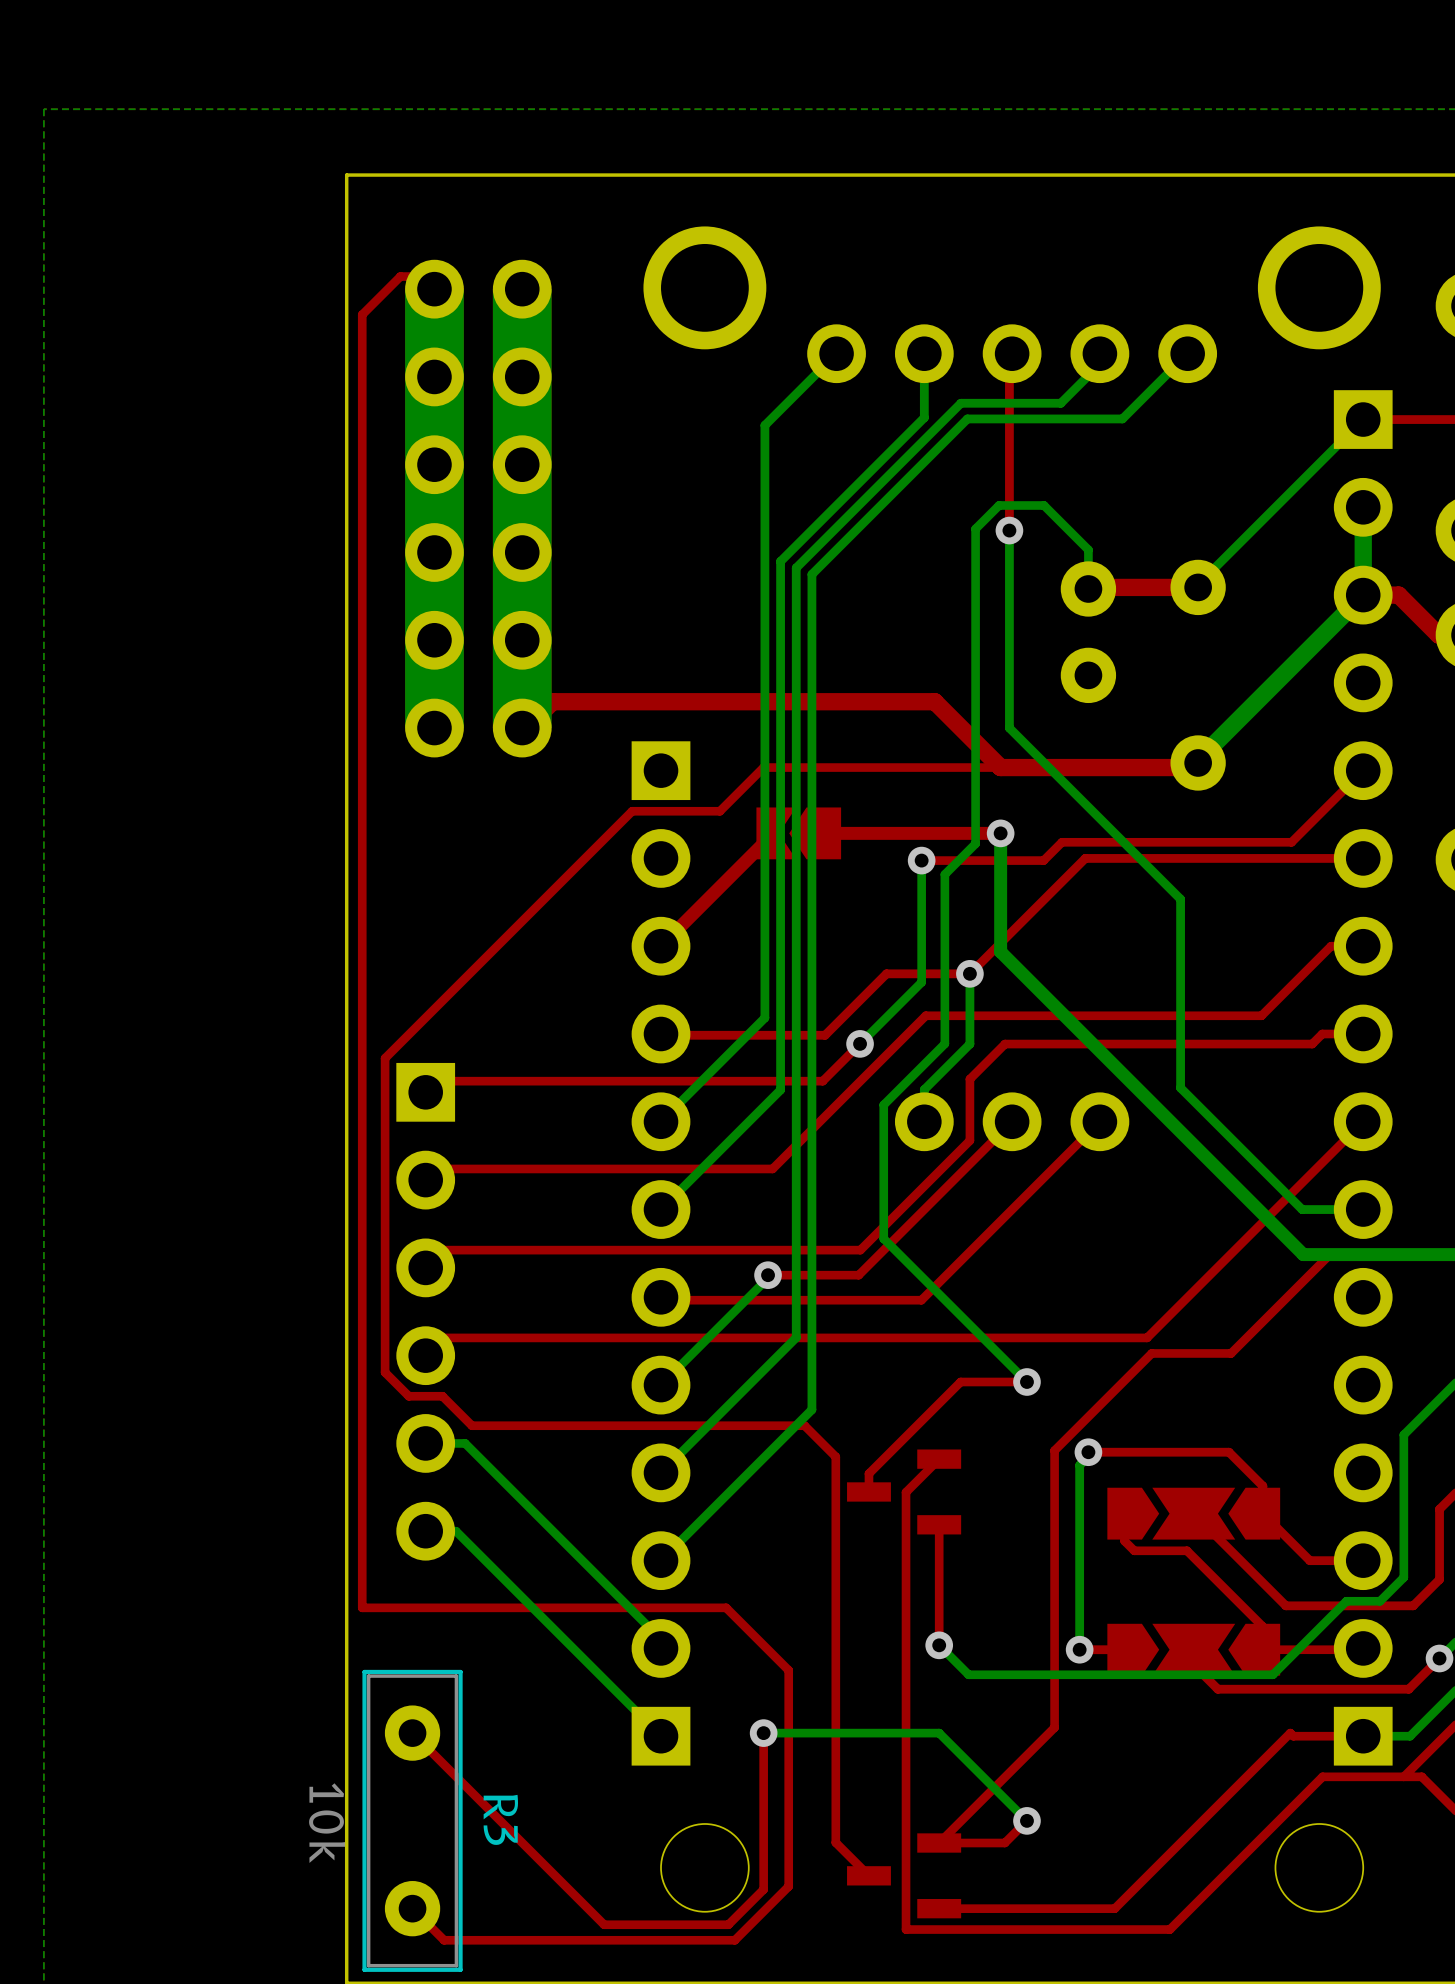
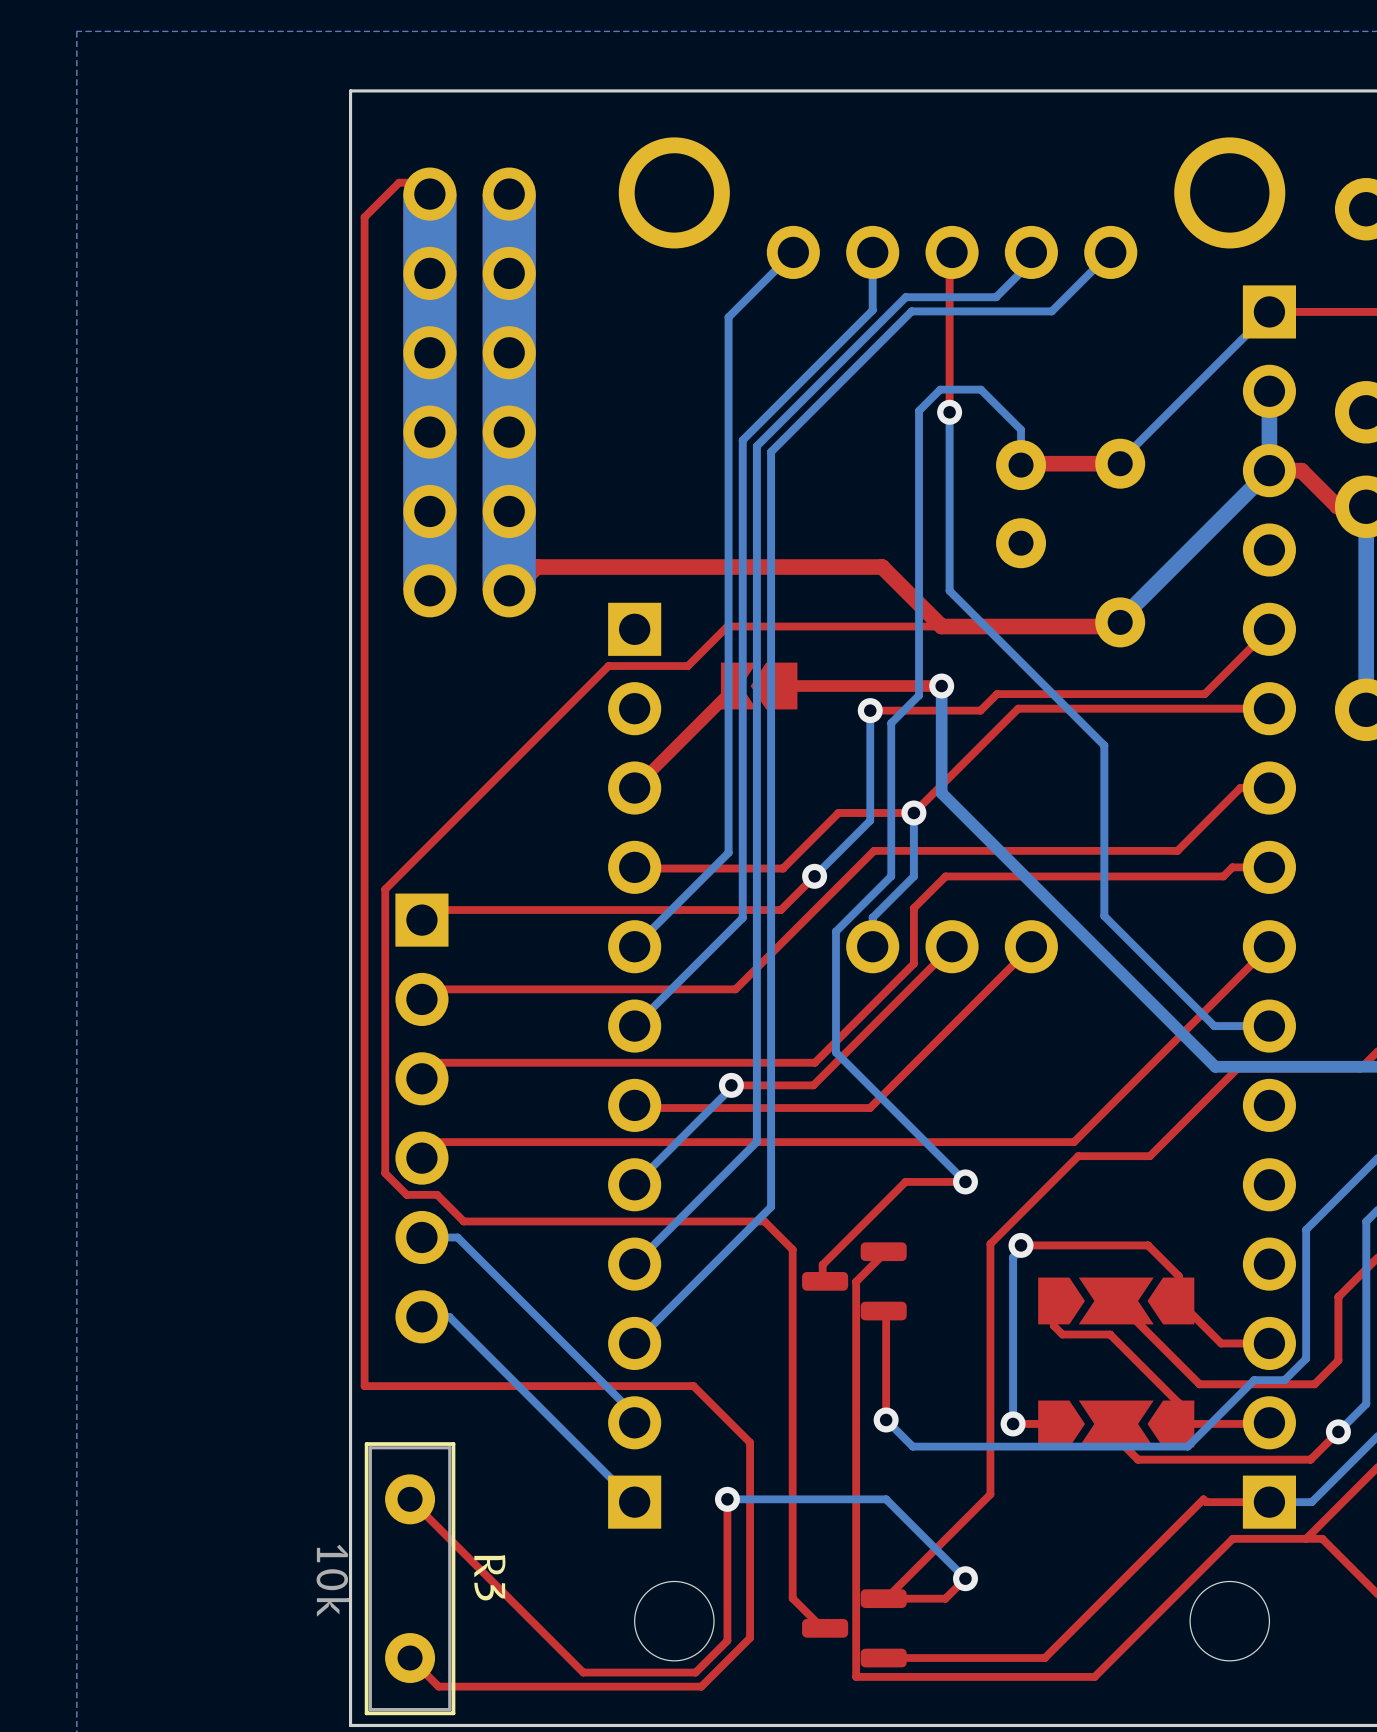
part footprint: [847, 1449, 962, 1535] -> [802, 1242, 907, 1321]
part footprint: [847, 1833, 962, 1919] -> [802, 1589, 907, 1668]

